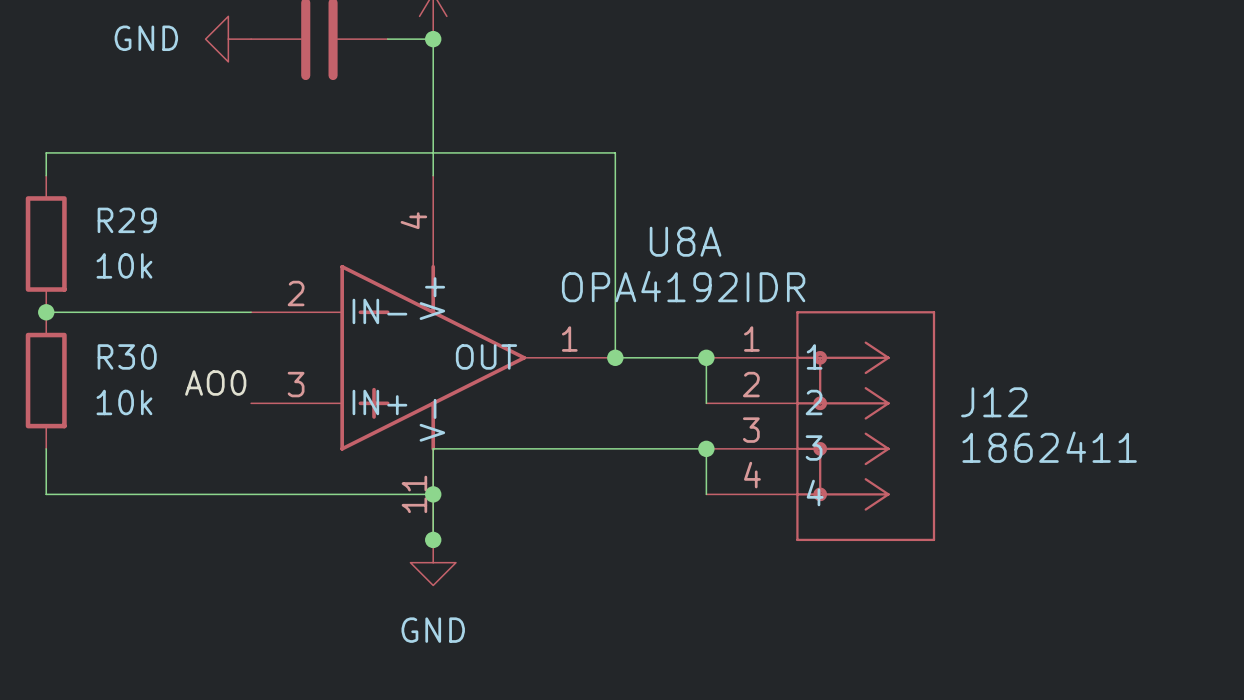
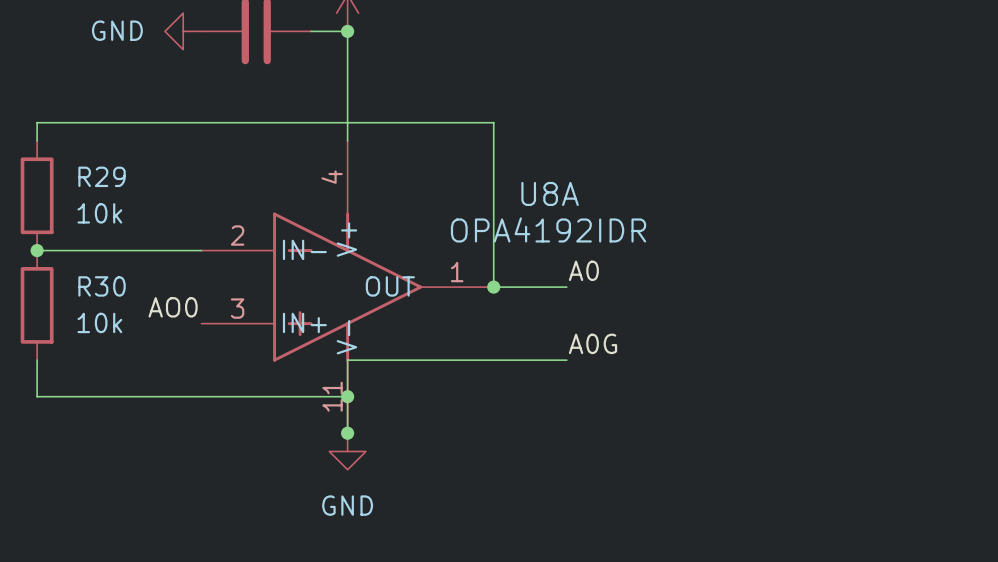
label: none -> A0 (583, 270)
wire: (706, 357) (706, 403) -> none
junction: (706, 357) -> none
J12: 1862411 (820, 426) -> none
label: none -> A0G (593, 343)
wire: (706, 448) (706, 494) -> none
junction: (706, 448) -> none

